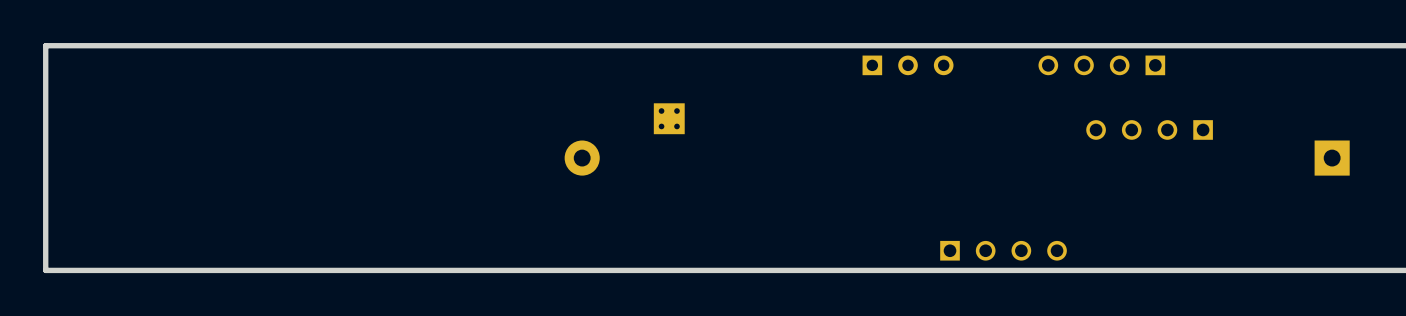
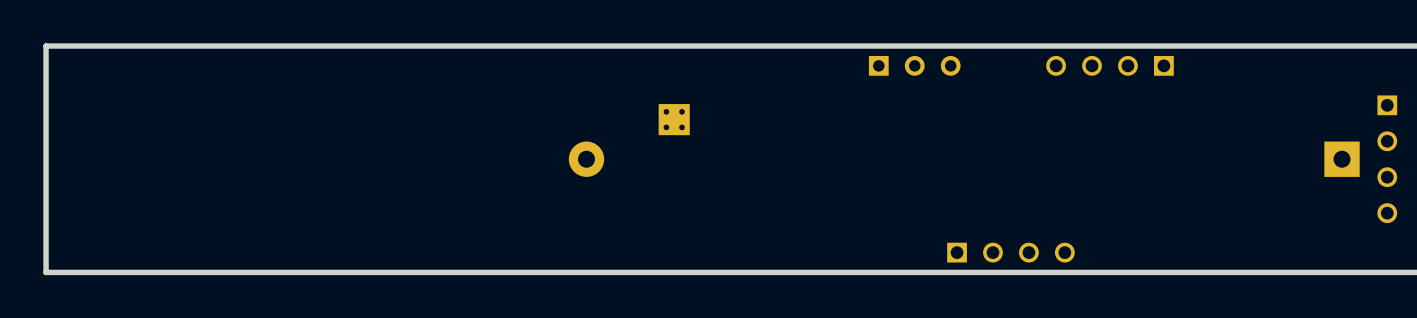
part rotation: 0° (1149, 129) -> 90° counterclockwise (1387, 159)
part position: (1149, 129) -> (1387, 159)

